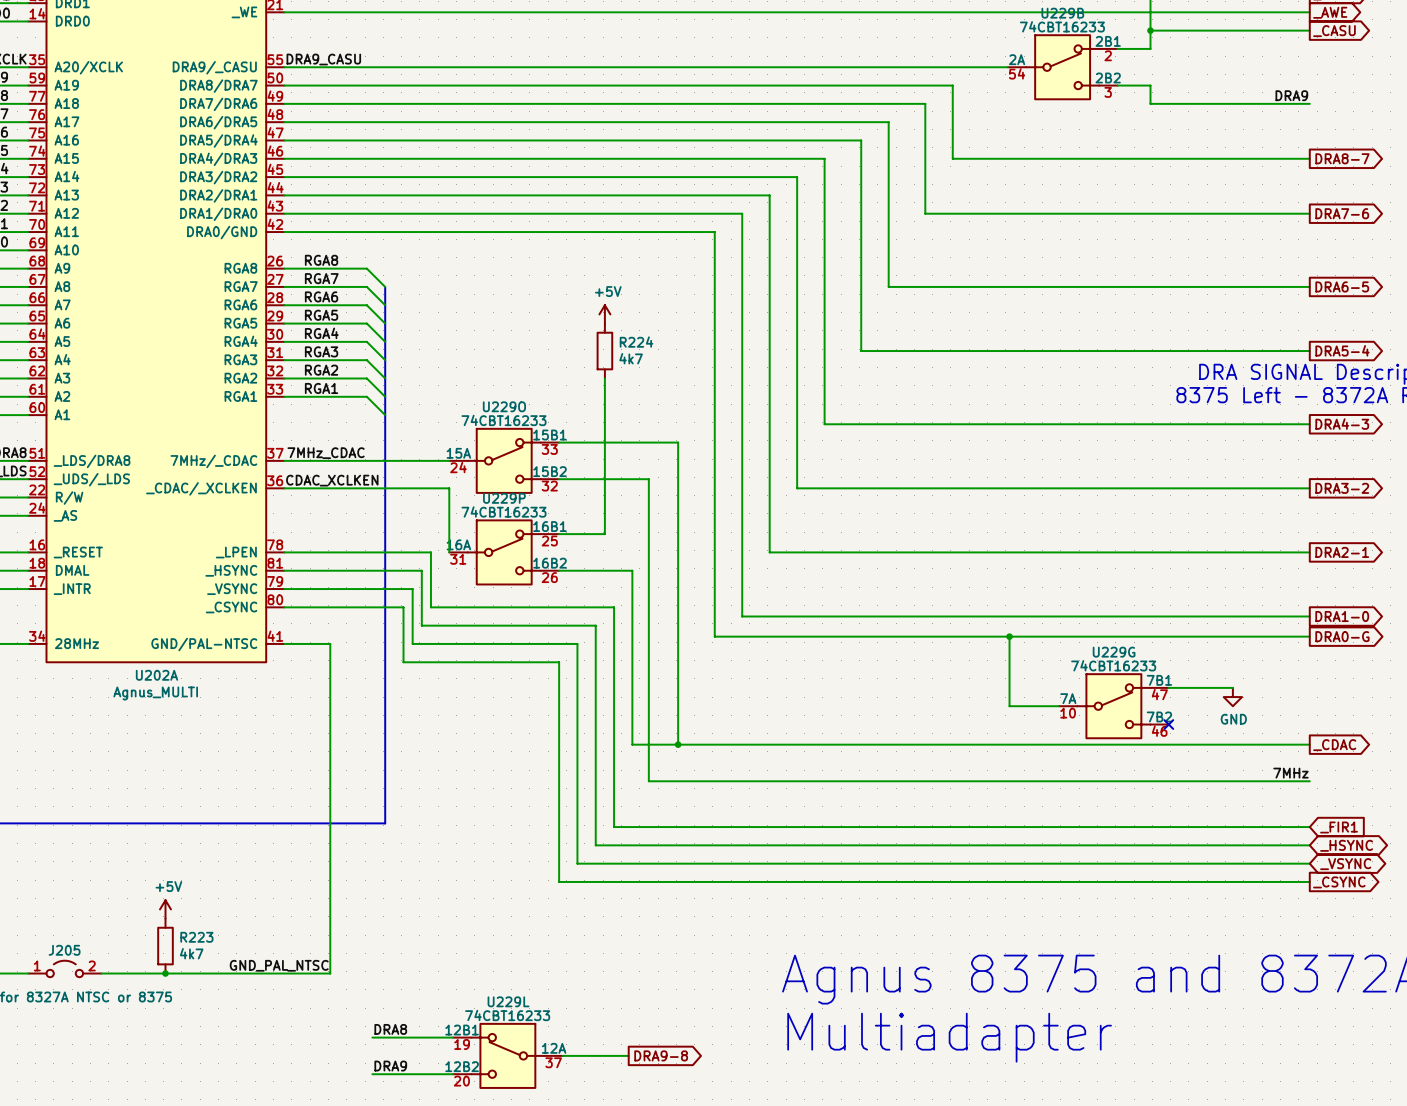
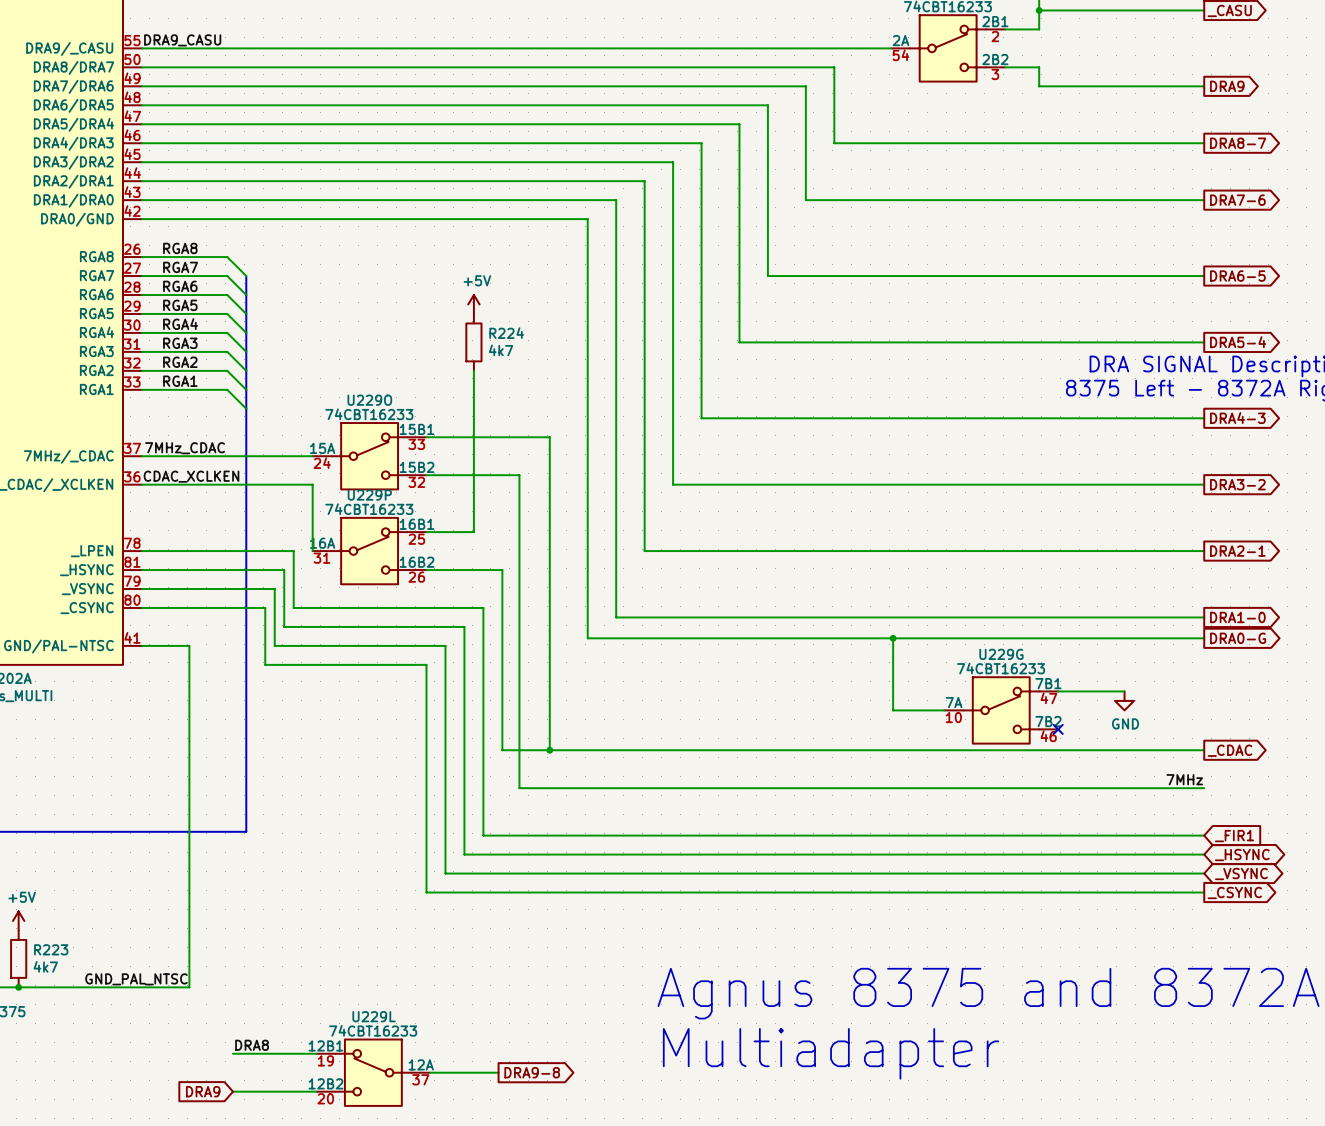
label: DRA9 (1291, 95) -> none
global label: none -> DRA9 (1227, 86)
label: DRA9 (390, 1066) -> none
global label: none -> DRA9 (203, 1091)

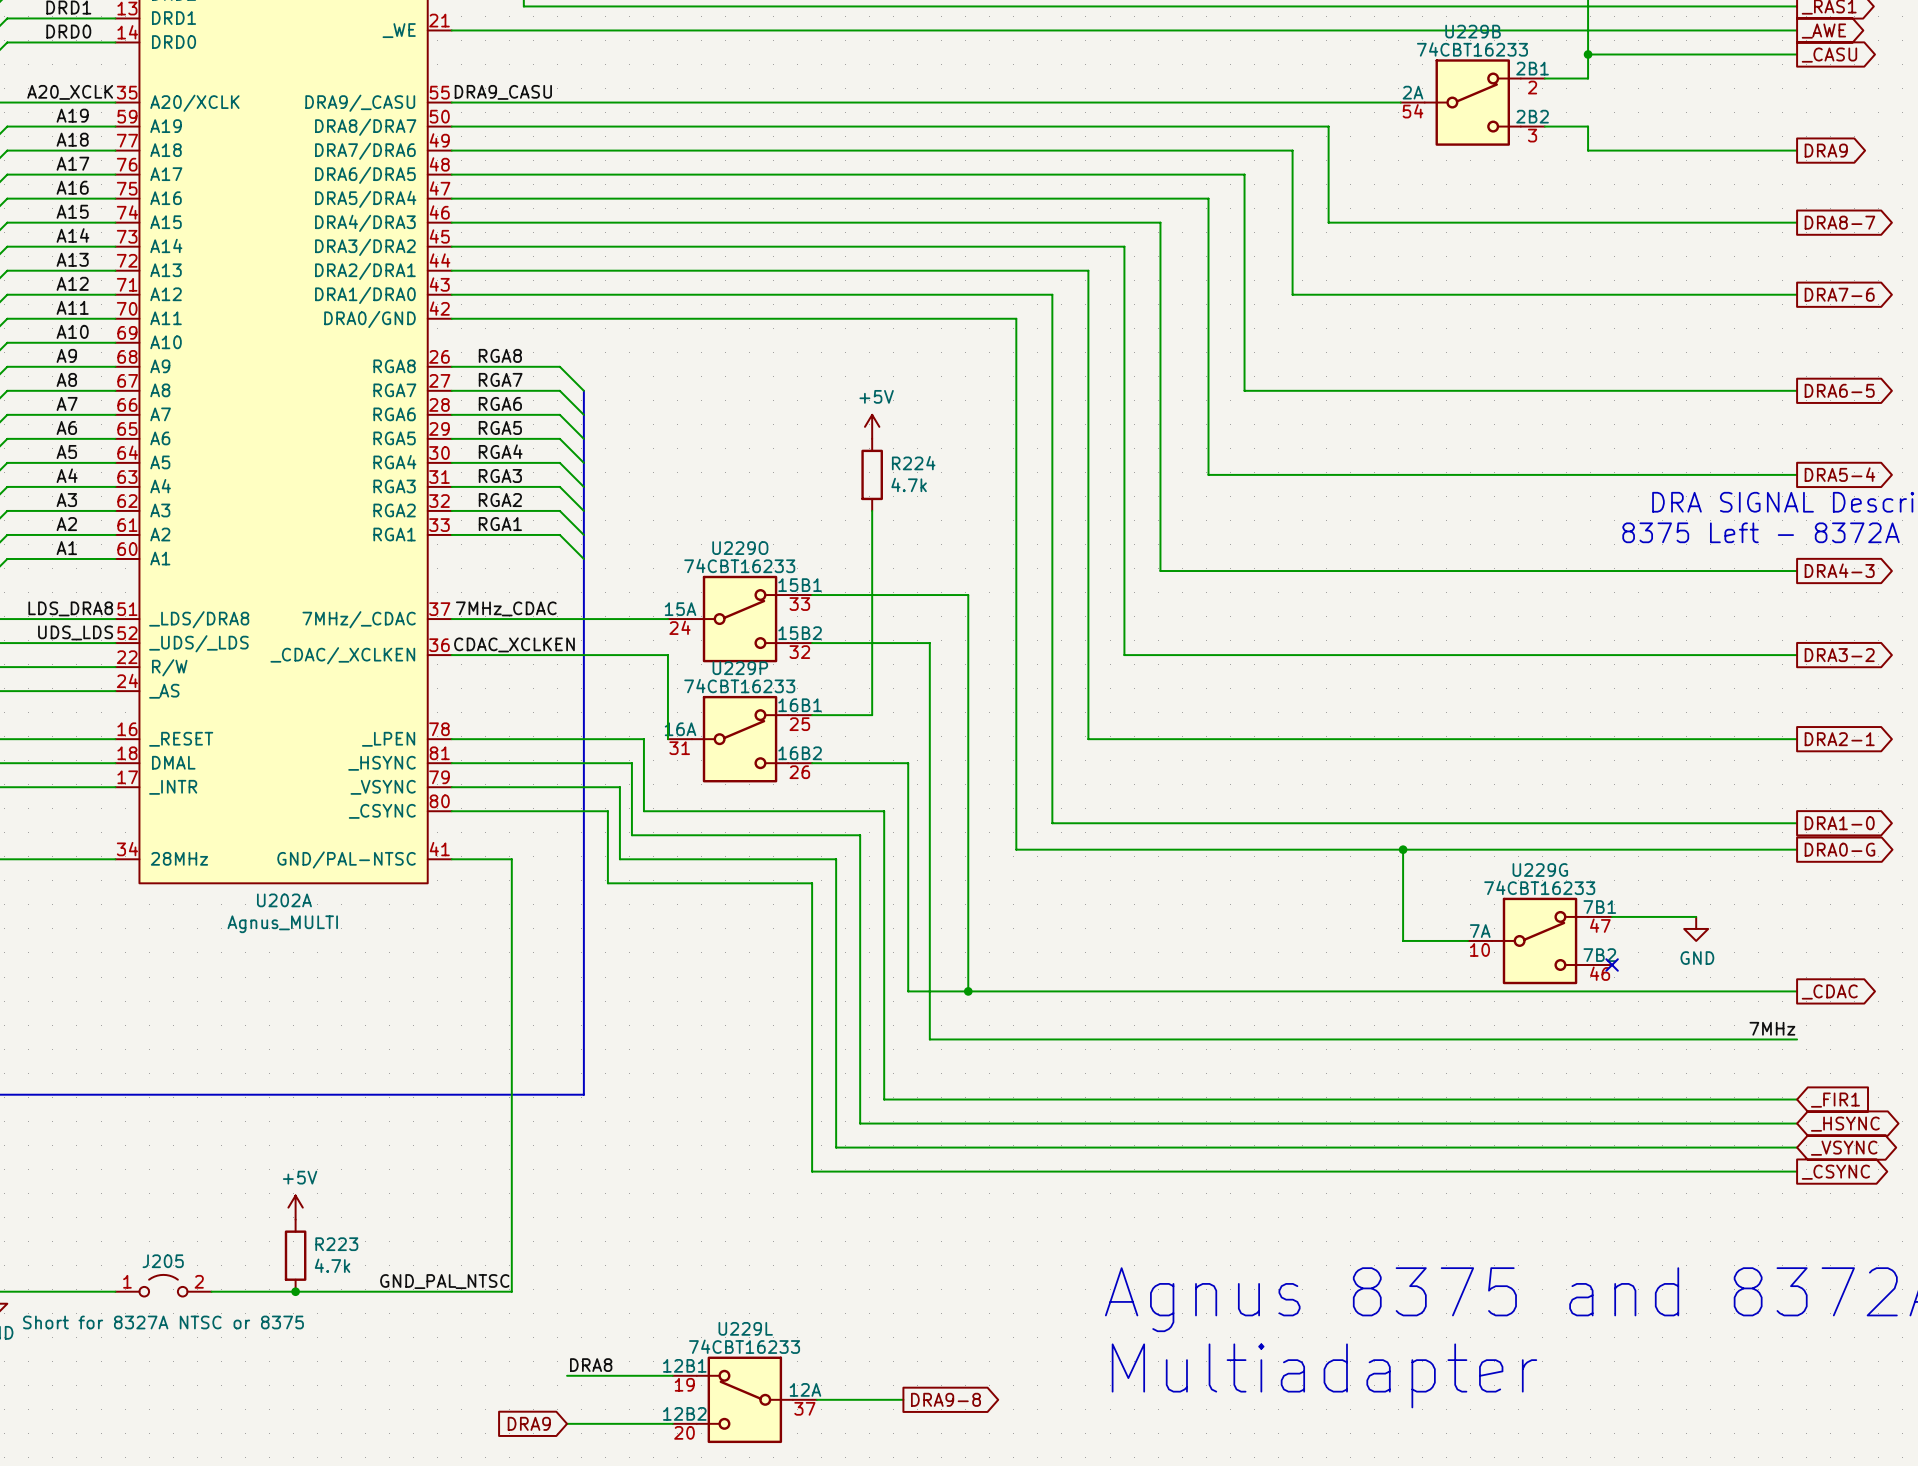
R224 value: 4k7 (501, 350) -> 4.7k (909, 484)
R223 value: 4k7 (45, 966) -> 4.7k (332, 1265)

